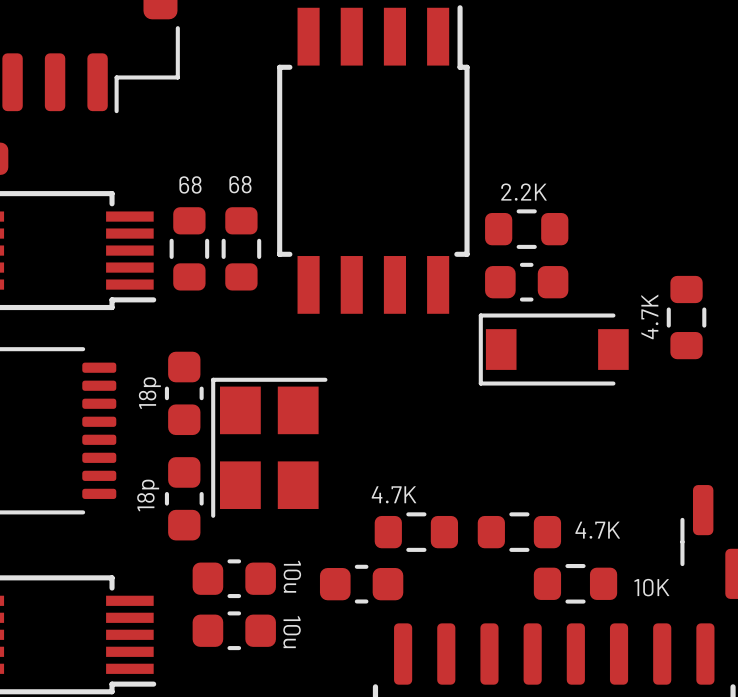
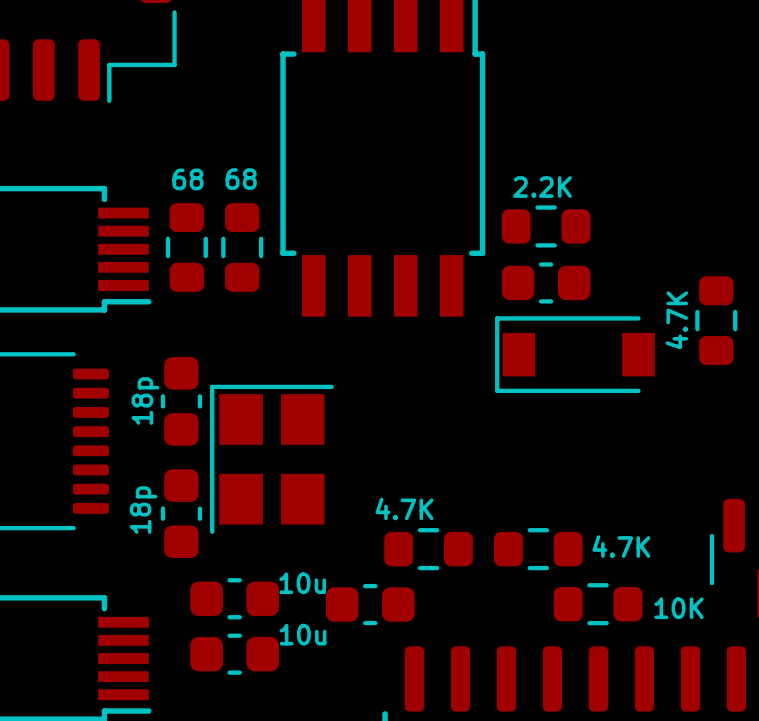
text rotation: 0° (292, 576) -> 90° counterclockwise (302, 583)
text rotation: 0° (292, 632) -> 90° counterclockwise (303, 634)

